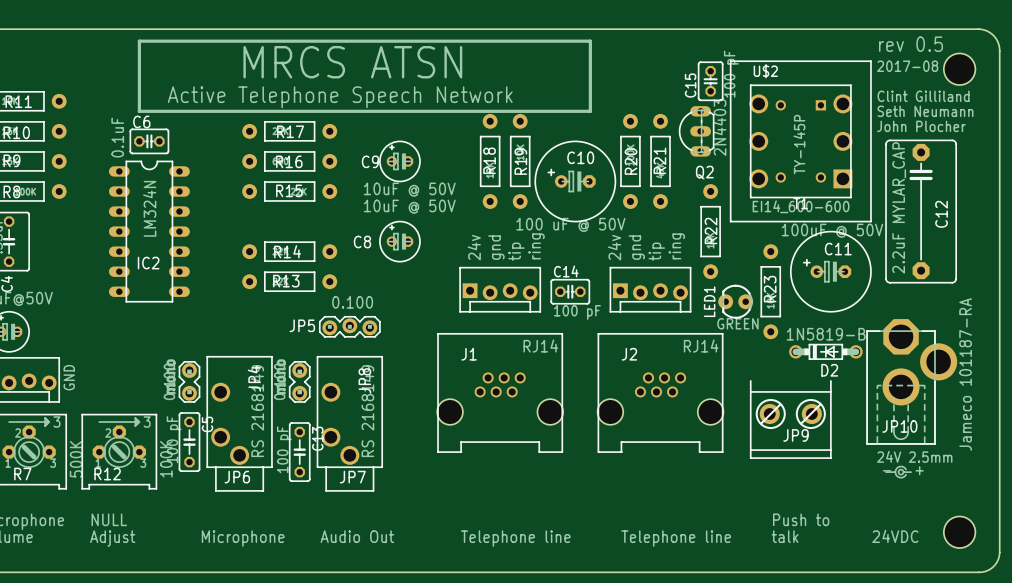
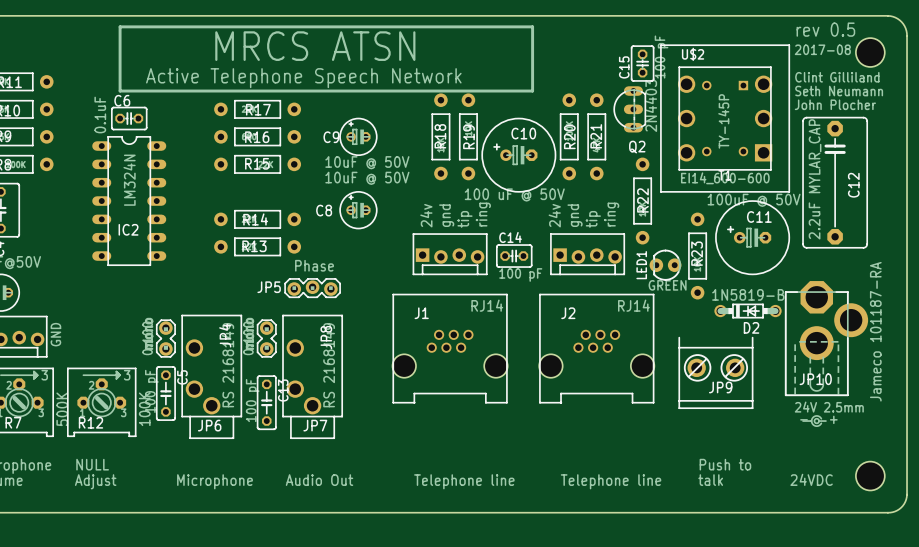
JP5 value: 0.100 (352, 302) -> Phase (314, 265)

